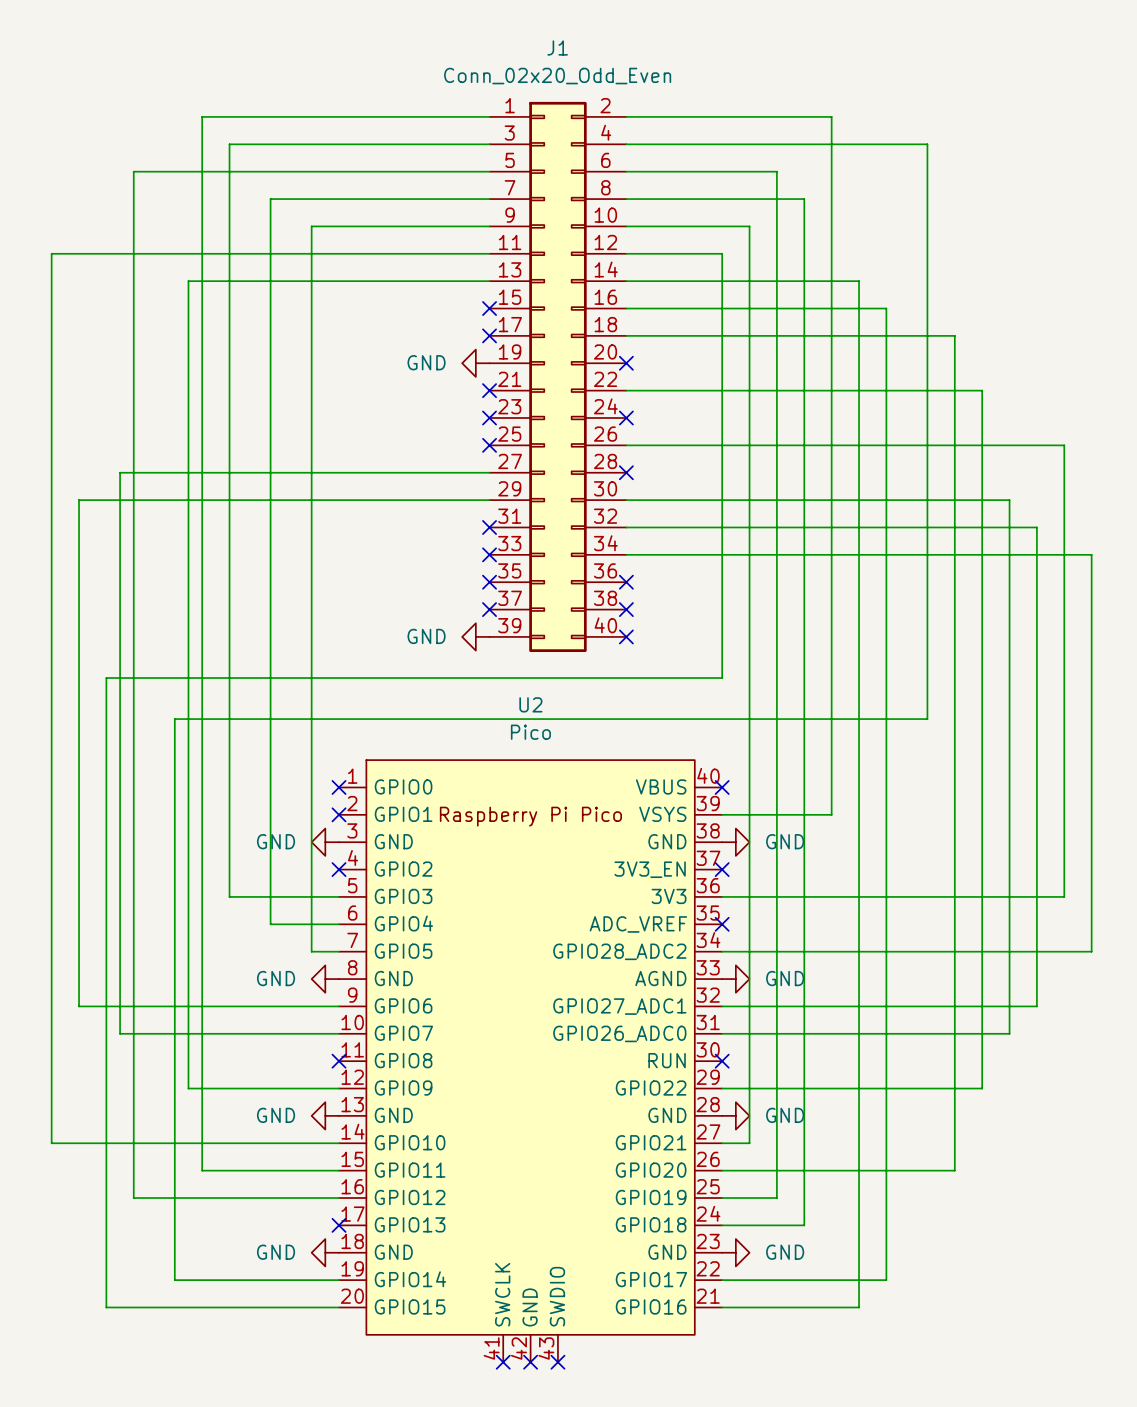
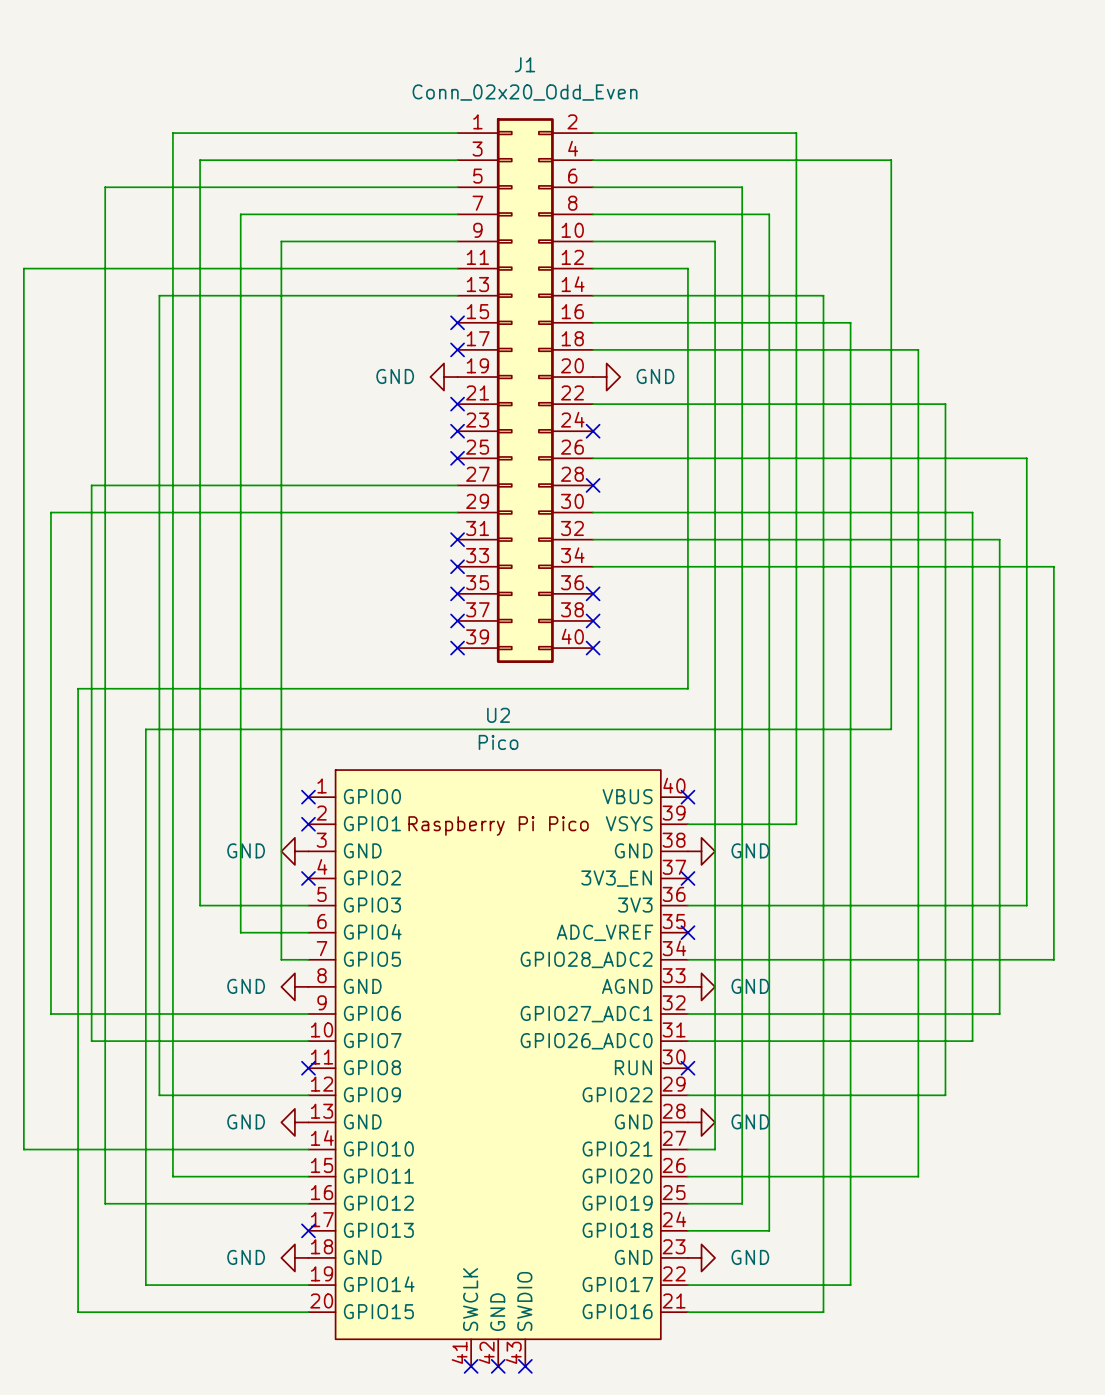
no-connect mark: (626, 363) -> none
power symbol: none -> GND (606, 377)
power symbol: GND (475, 636) -> none
no-connect mark: none -> (457, 648)

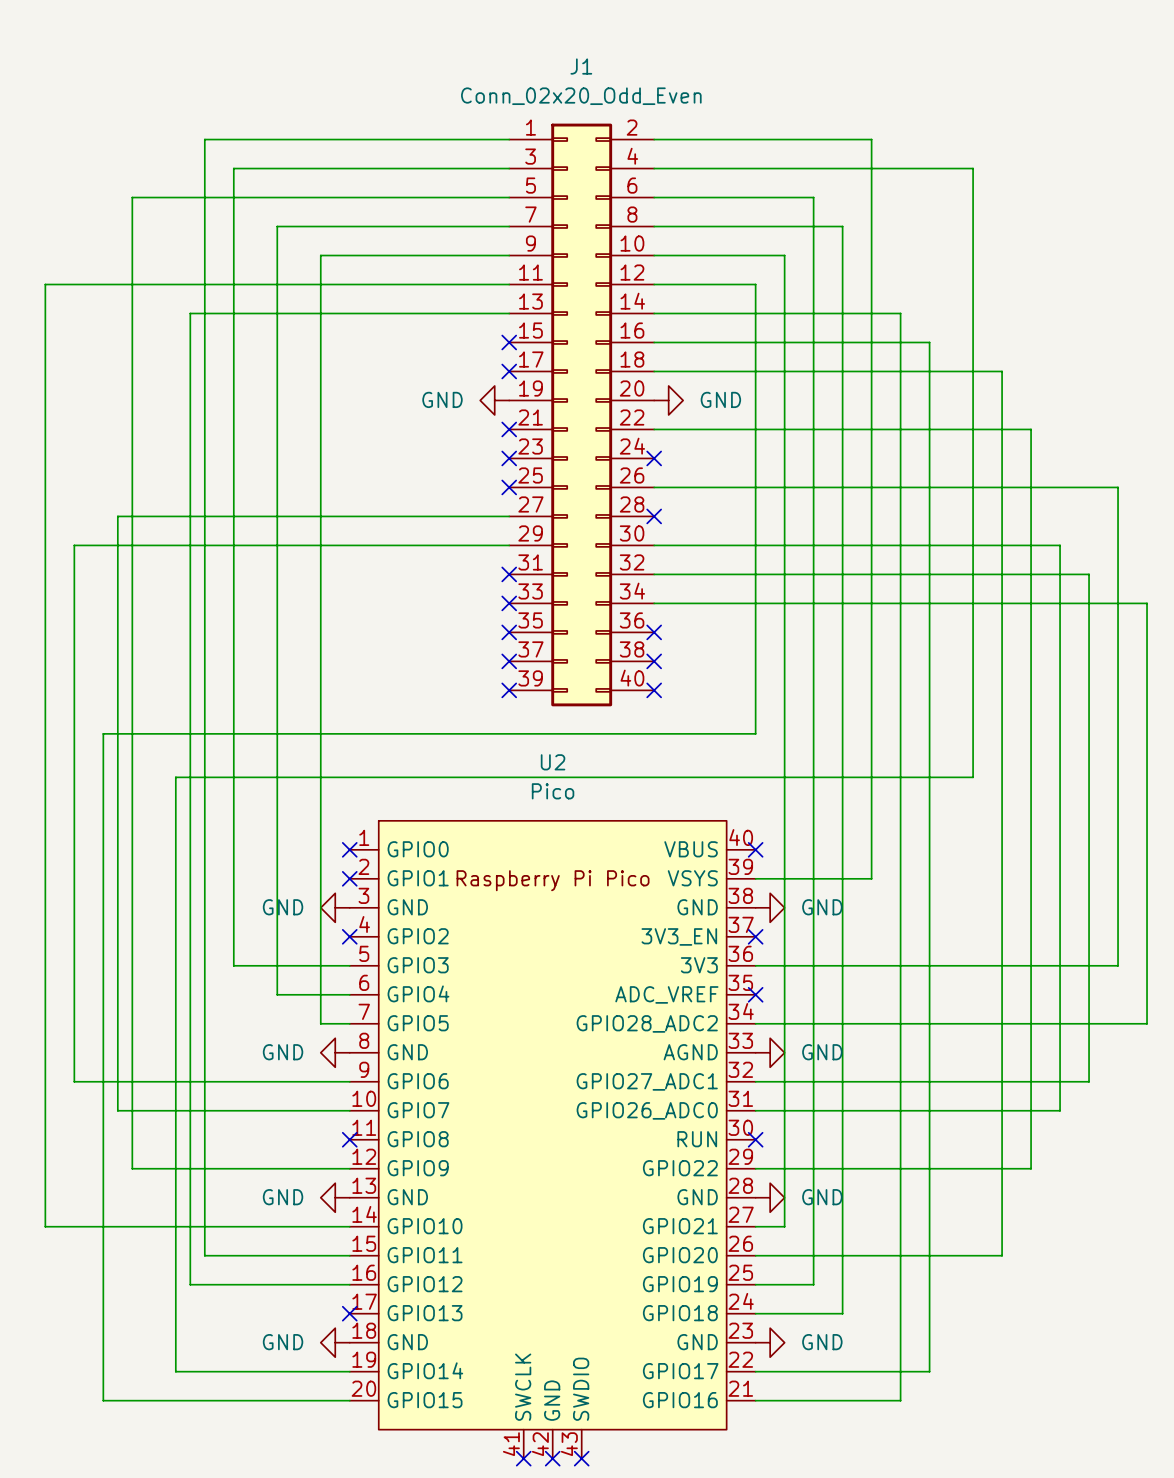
wire: (105, 1095) (105, 1203) (159, 1203) -> (132, 1168) (190, 1168) (190, 1284)

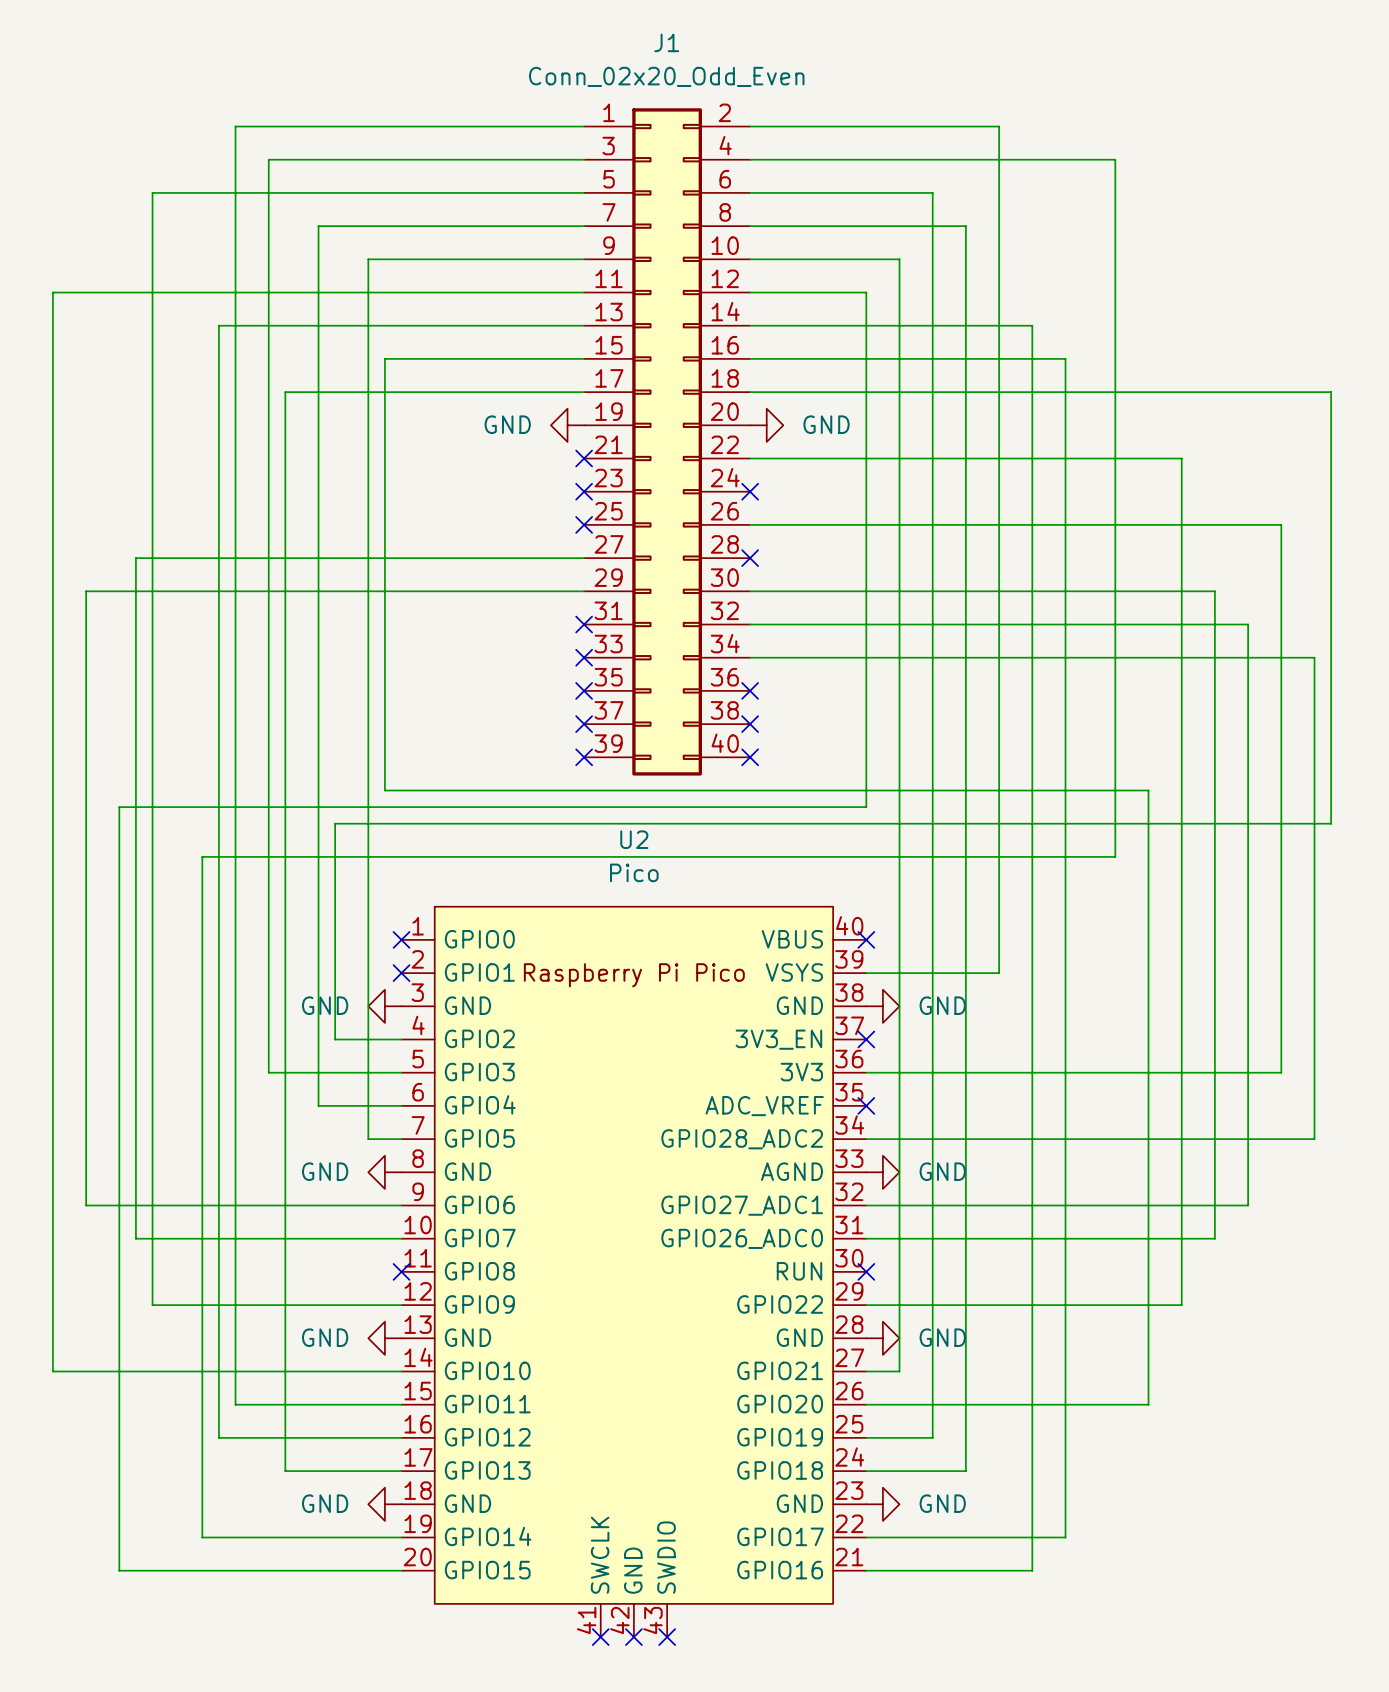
no-connect mark: (509, 342) -> none
wire: none -> (584, 392) (285, 392) (285, 1471) (401, 1471)
no-connect mark: (509, 371) -> none
wire: (1002, 371) (1002, 719) -> (584, 358) (384, 358) (384, 790) (1148, 790)
wire: none -> (1148, 392) (1331, 392) (1331, 823) (335, 823) (335, 1039) (401, 1039)
no-connect mark: (349, 936) -> none
no-connect mark: (349, 1313) -> none

